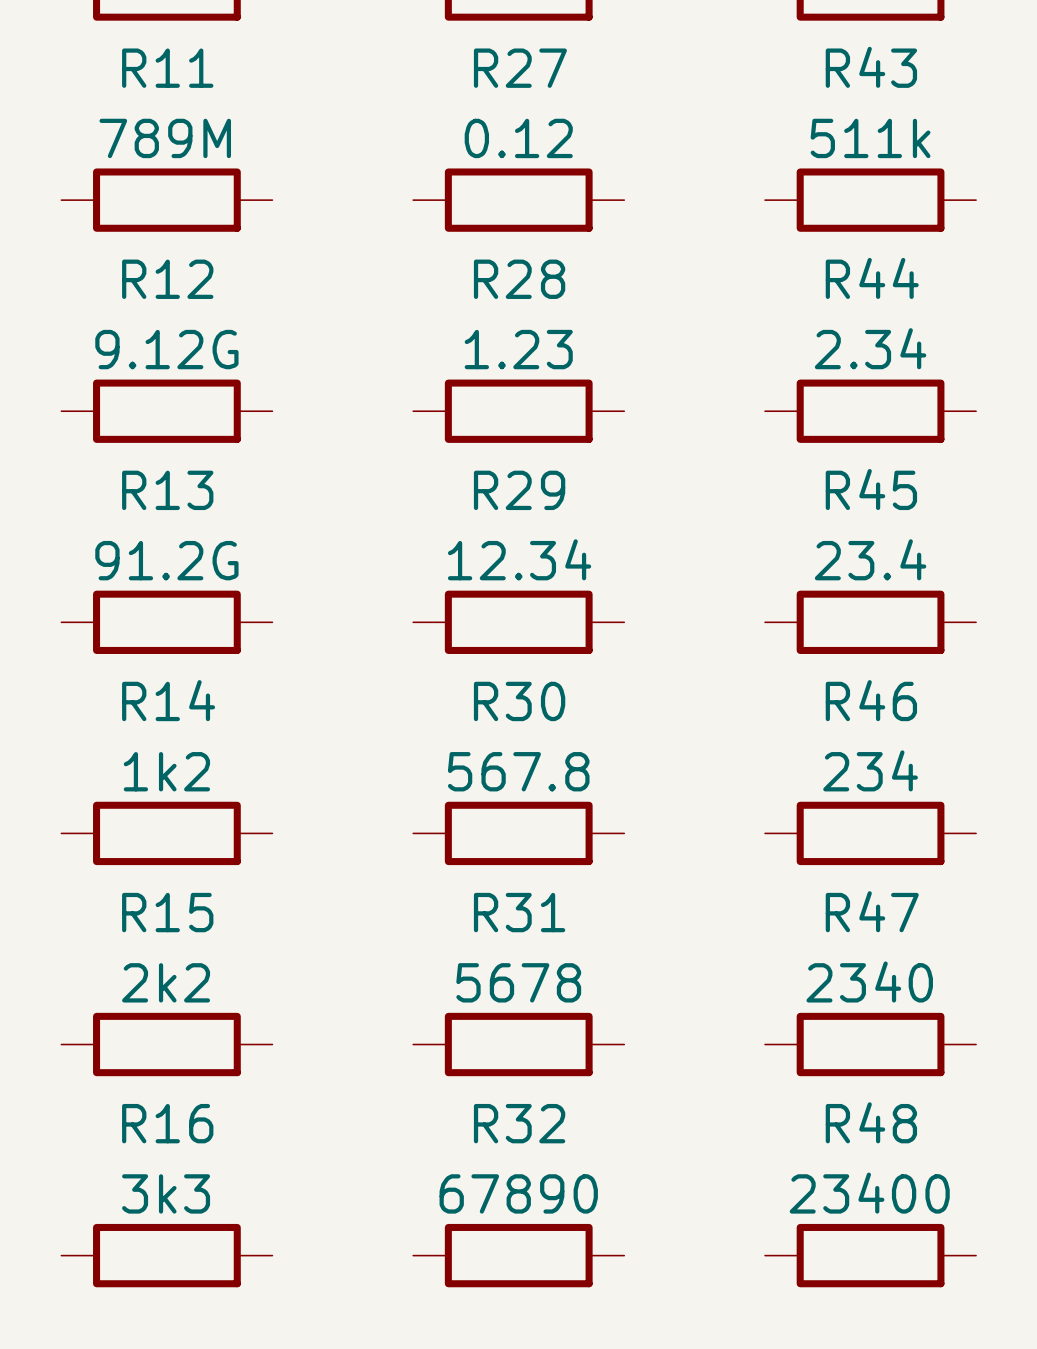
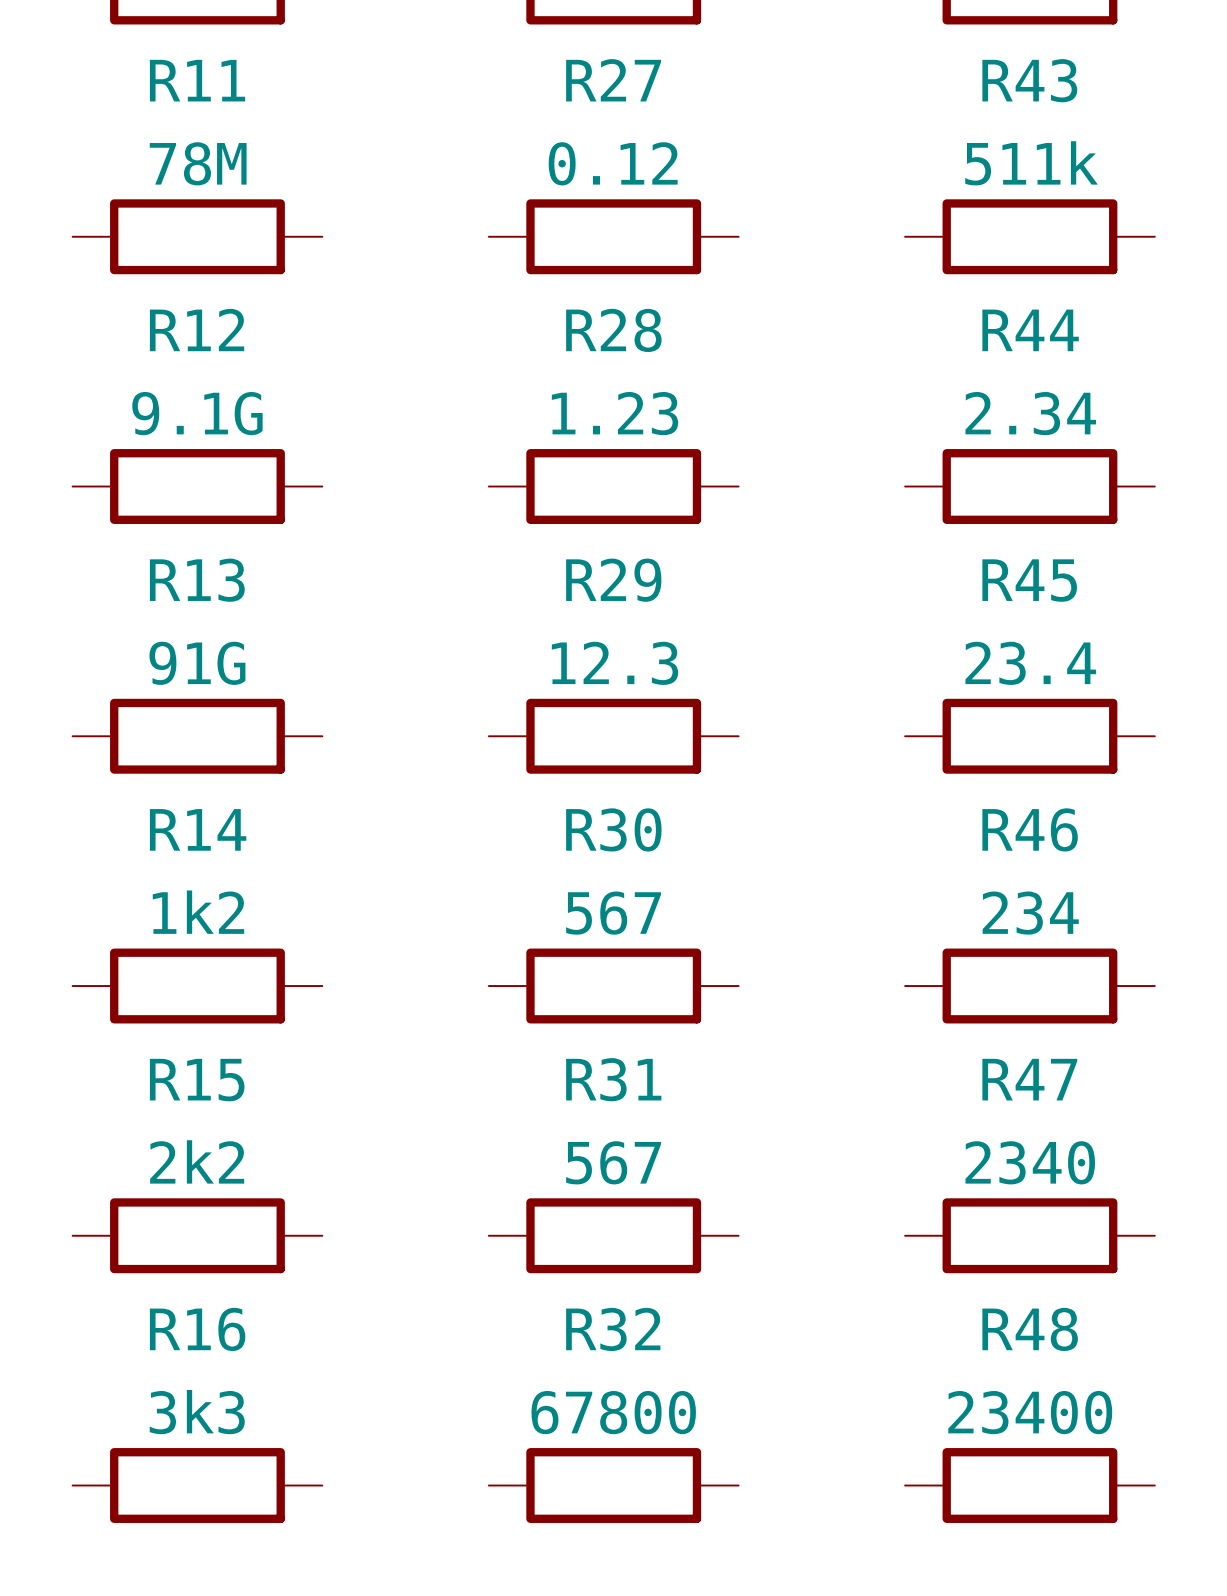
R11 value: 789M (165, 138) -> 78M (198, 163)
R12 value: 9.12G (166, 349) -> 9.1G (197, 413)
R29 value: 12.34 (519, 559) -> 12.3 (615, 663)
R13 value: 91.2G (166, 560) -> 91G (197, 663)
R30 value: 567.8 (518, 771) -> 567 (613, 913)
R31 value: 5678 (518, 982) -> 567 (613, 1162)
R32 value: 67890 (518, 1193) -> 67800 (613, 1412)

